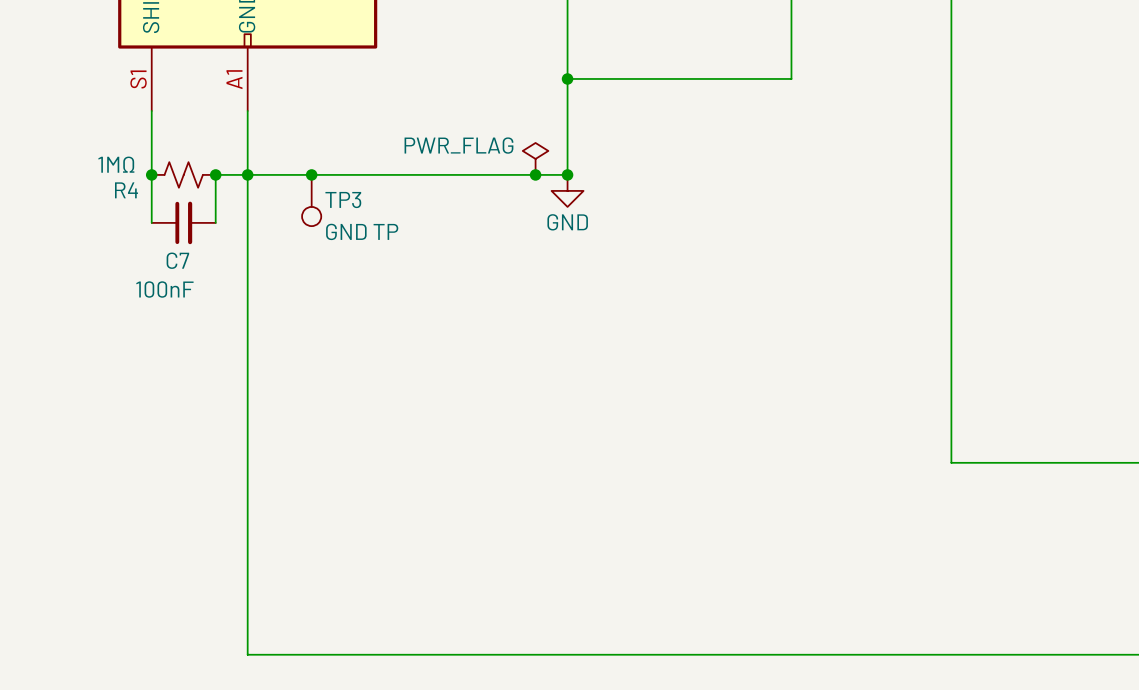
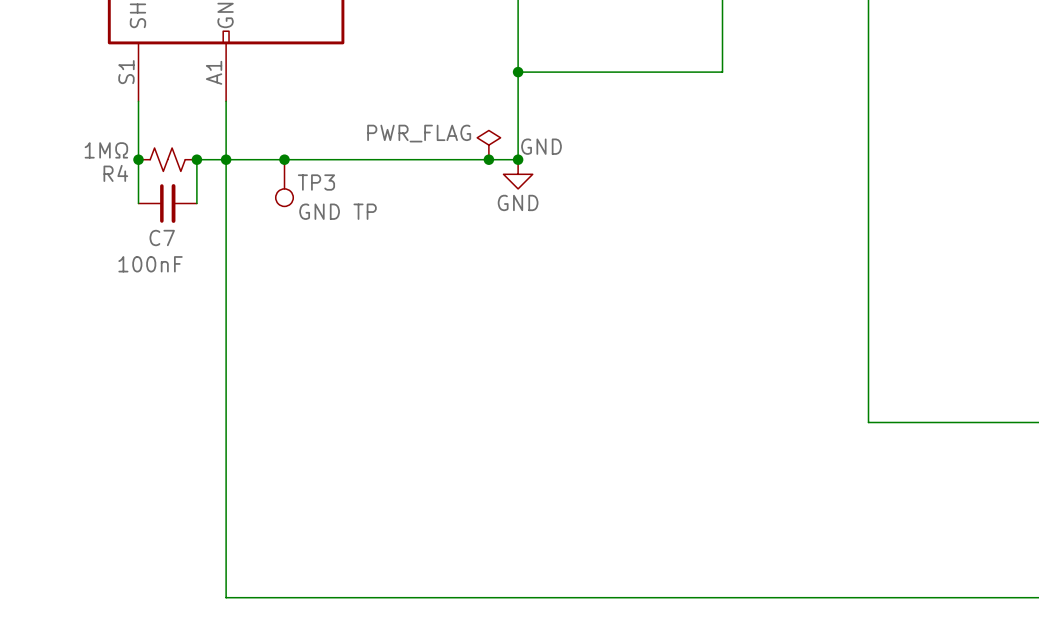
label: none -> GND (541, 146)

